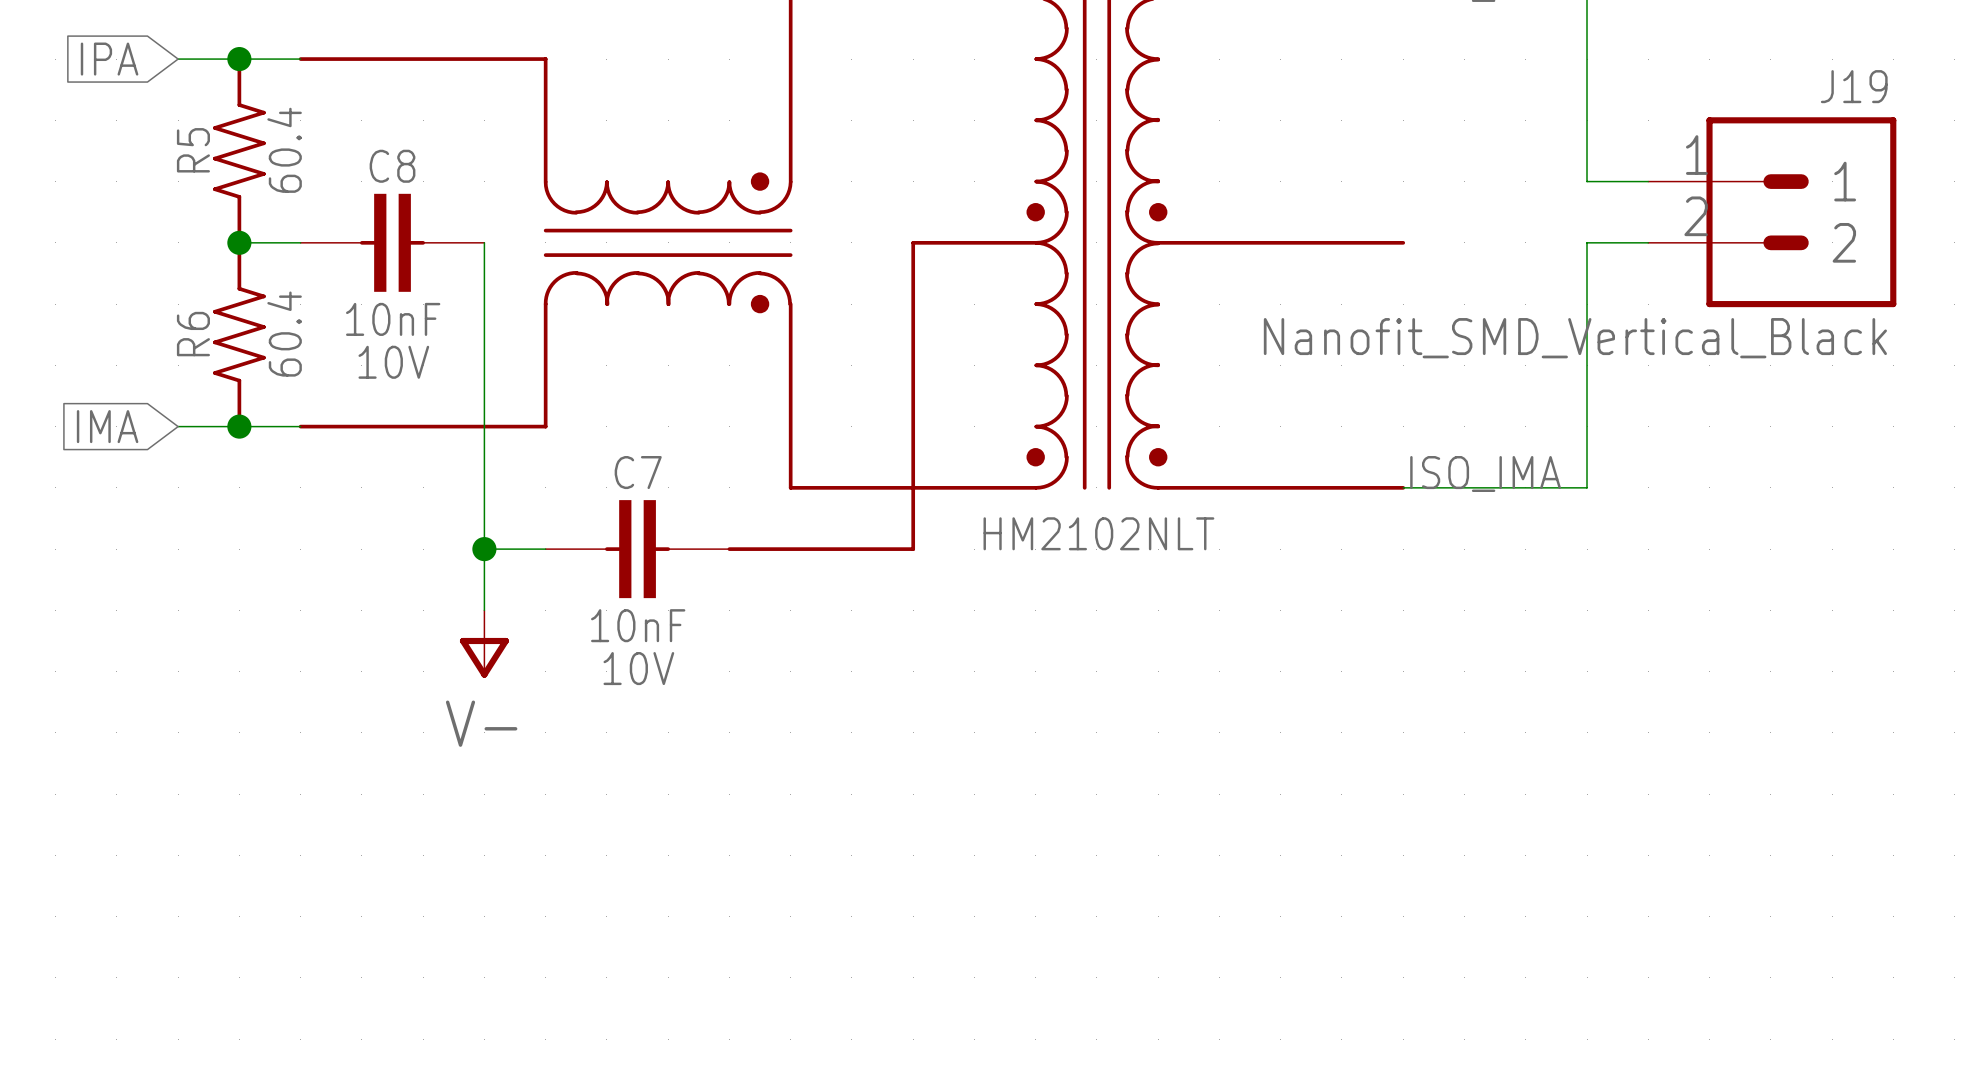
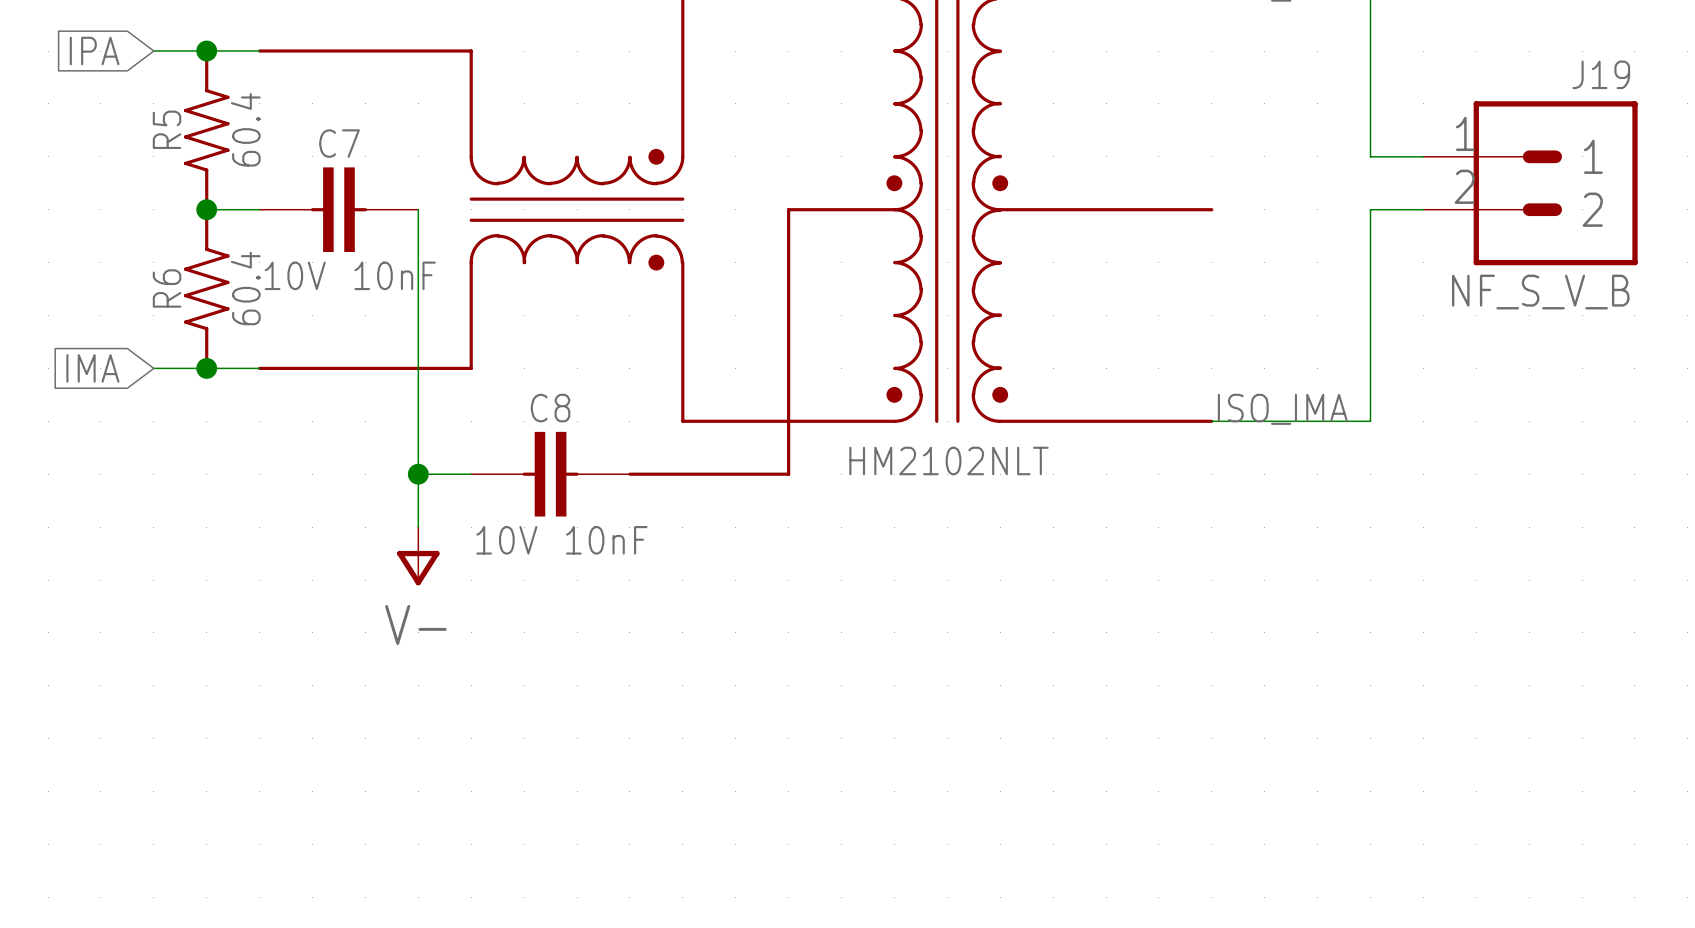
C8 name: C8 (392, 166) -> C7 (339, 143)
C8 text position: 10nF (393, 319) -> 10nF (395, 275)
J19 text: Nanofit_SMD_Vertical_Black (1575, 338) -> NF_S_V_B (1540, 292)
C8 text position: 10V (393, 362) -> 10V (295, 275)
C7 name: C7 (638, 472) -> C8 (550, 408)
C7 text position: 10nF (638, 625) -> 10nF (606, 540)
C7 text position: 10V (638, 668) -> 10V (506, 540)

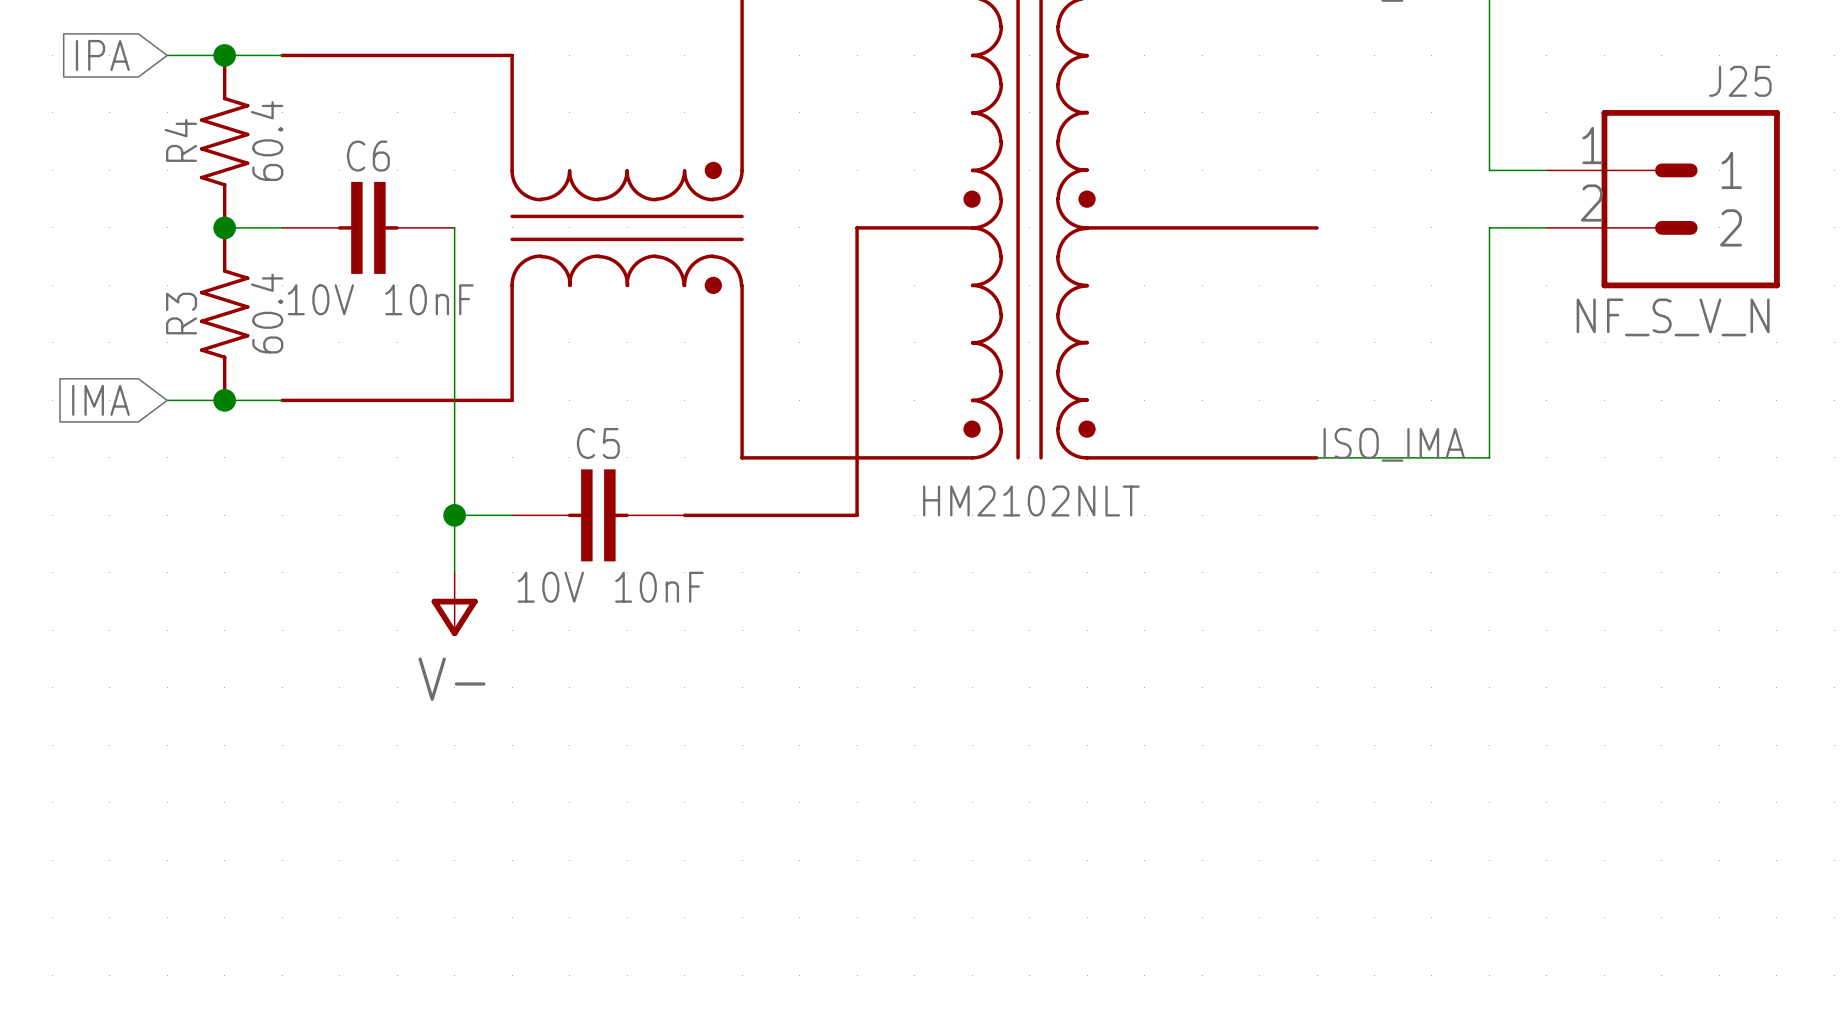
J19 name: J19 (1601, 74) -> J25 (1740, 81)
R5 name: R5 (167, 129) -> R4 (180, 140)
C7 name: C7 (339, 143) -> C6 (368, 156)
R6 name: R6 (167, 288) -> R3 (181, 313)
J19 text: NF_S_V_B (1540, 292) -> NF_S_V_N (1673, 317)
C8 name: C8 (550, 408) -> C5 (598, 443)

